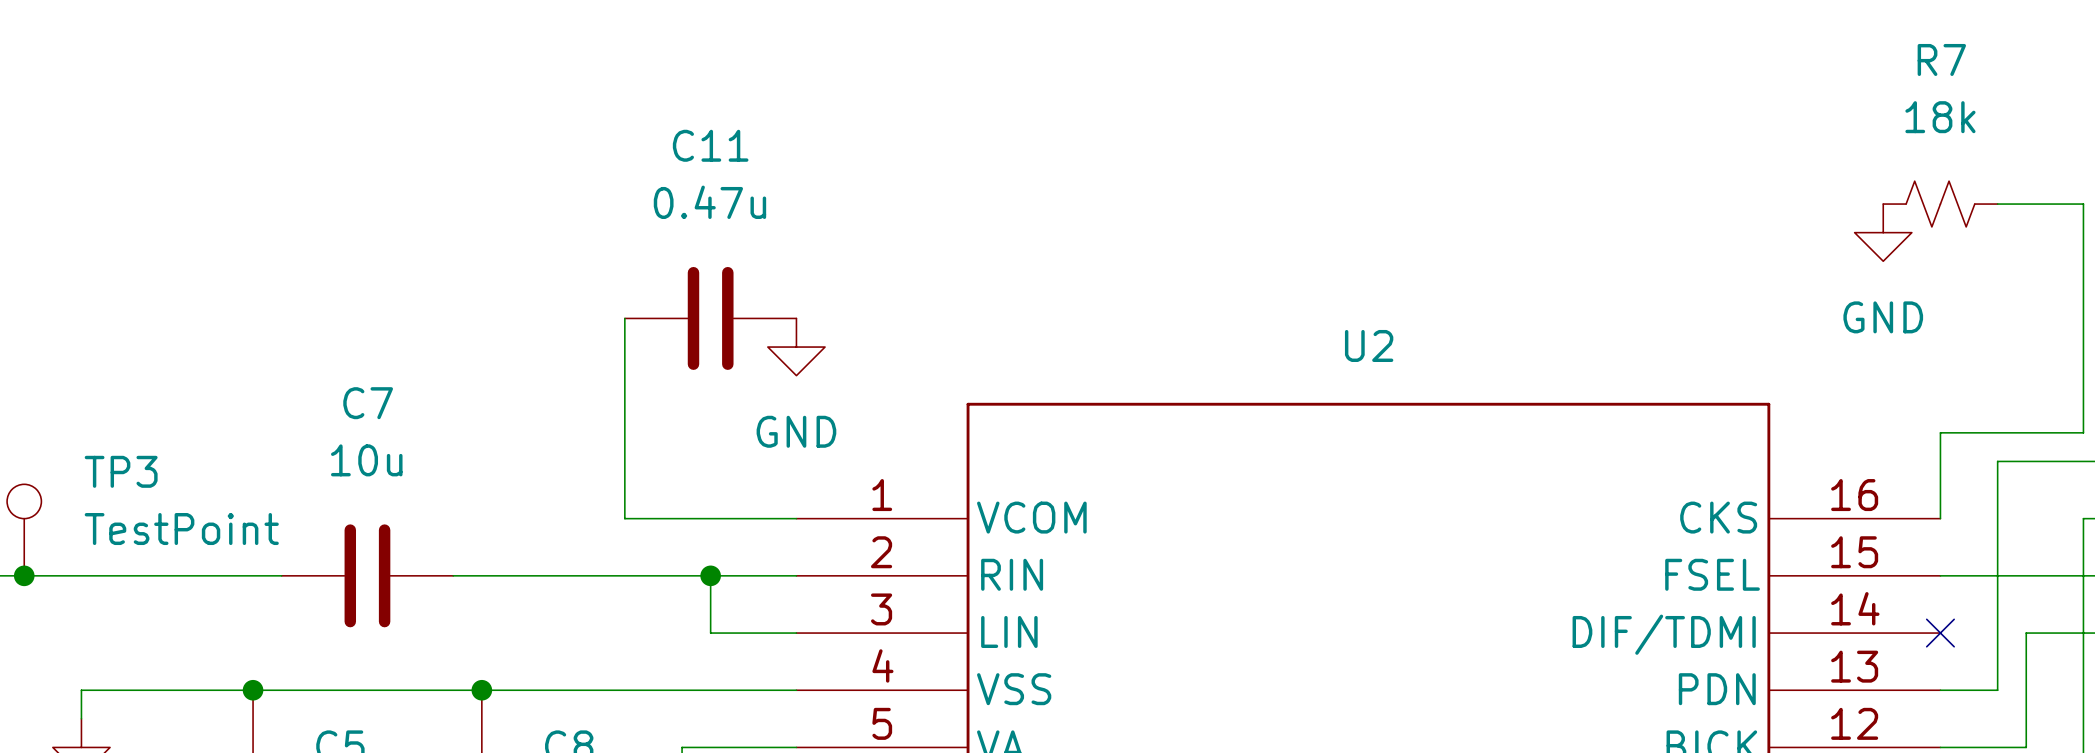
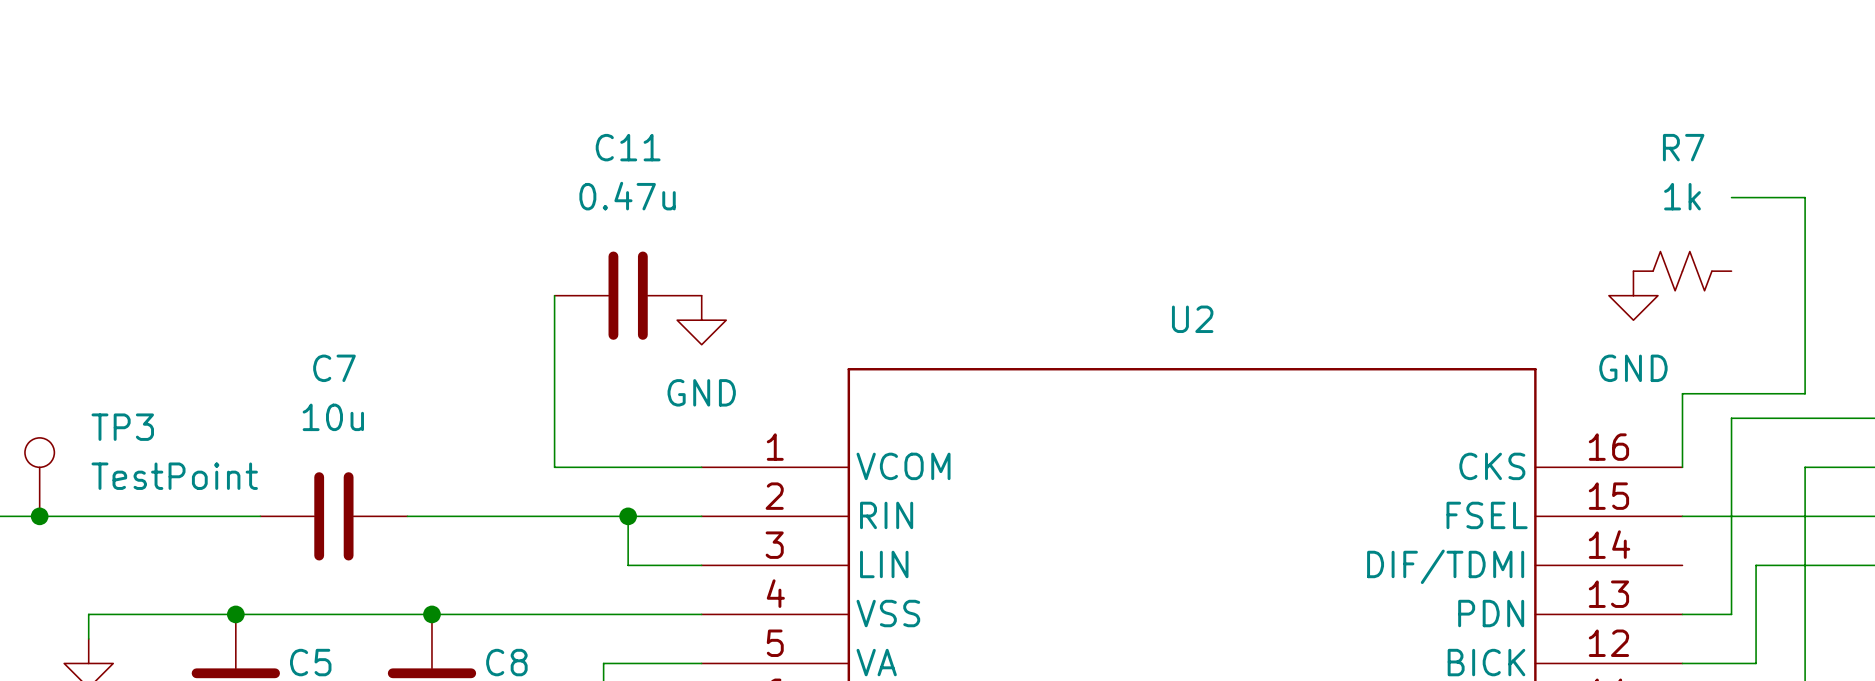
R7 value: 18k (1940, 117) -> 1k (1682, 196)
R7 position: (1940, 204) -> (1682, 271)
power symbol position: GND (1883, 232) -> GND (1633, 295)
no-connect mark: (1940, 633) -> none

